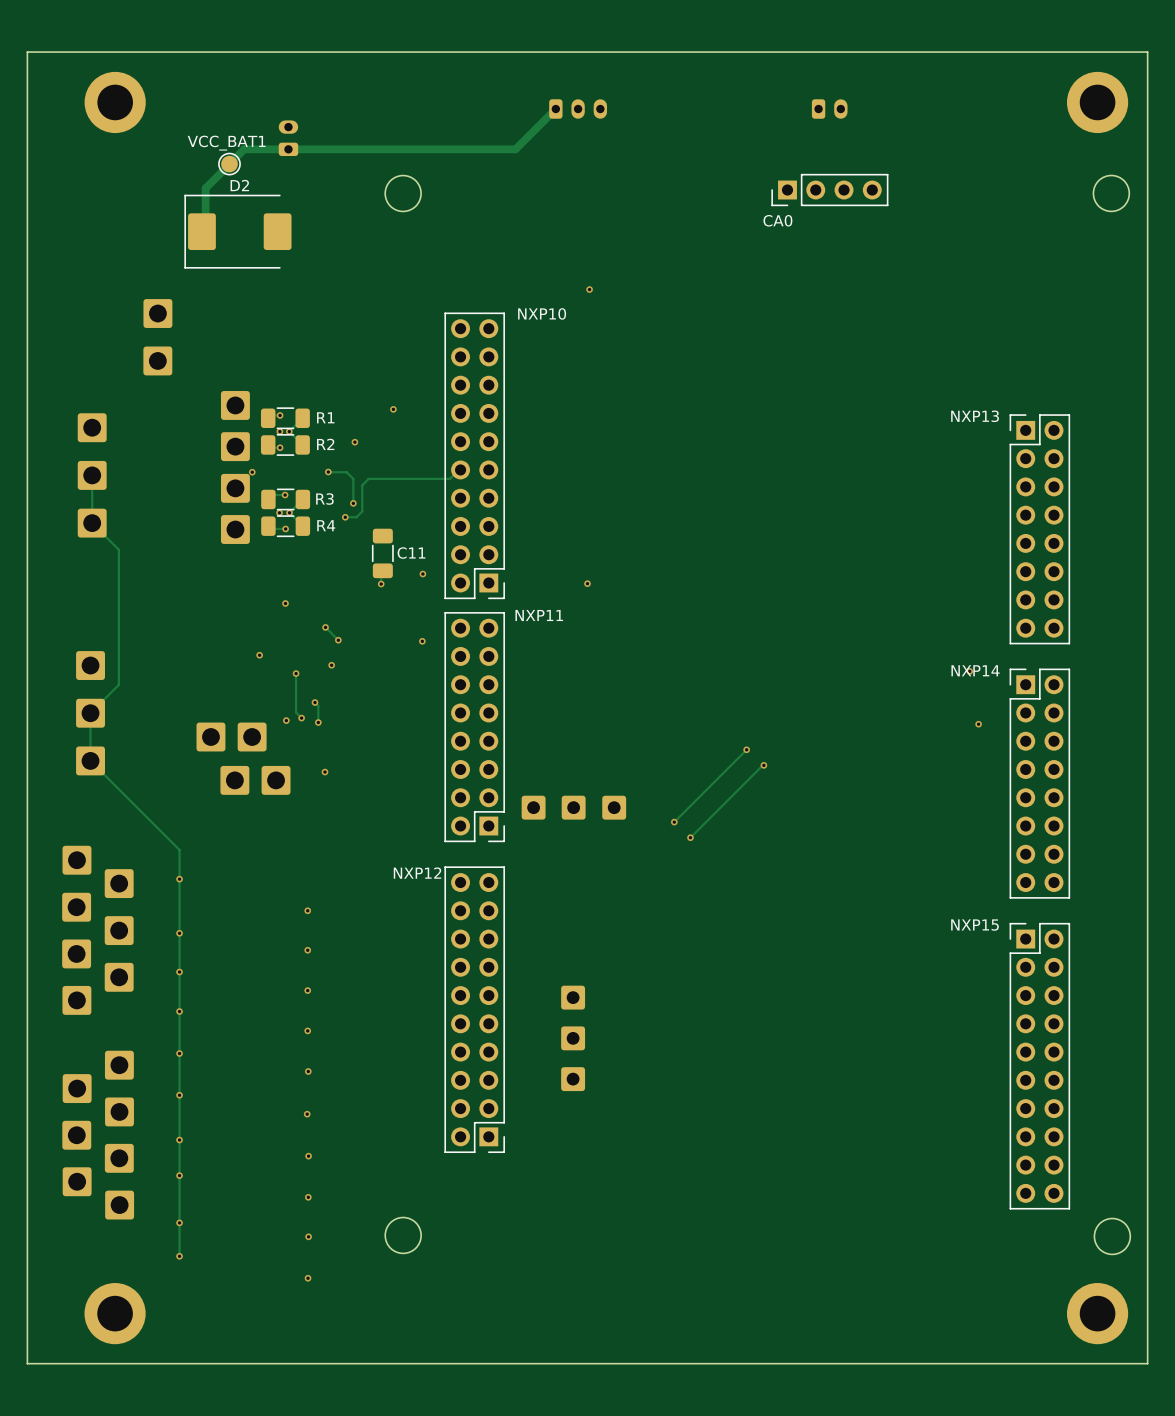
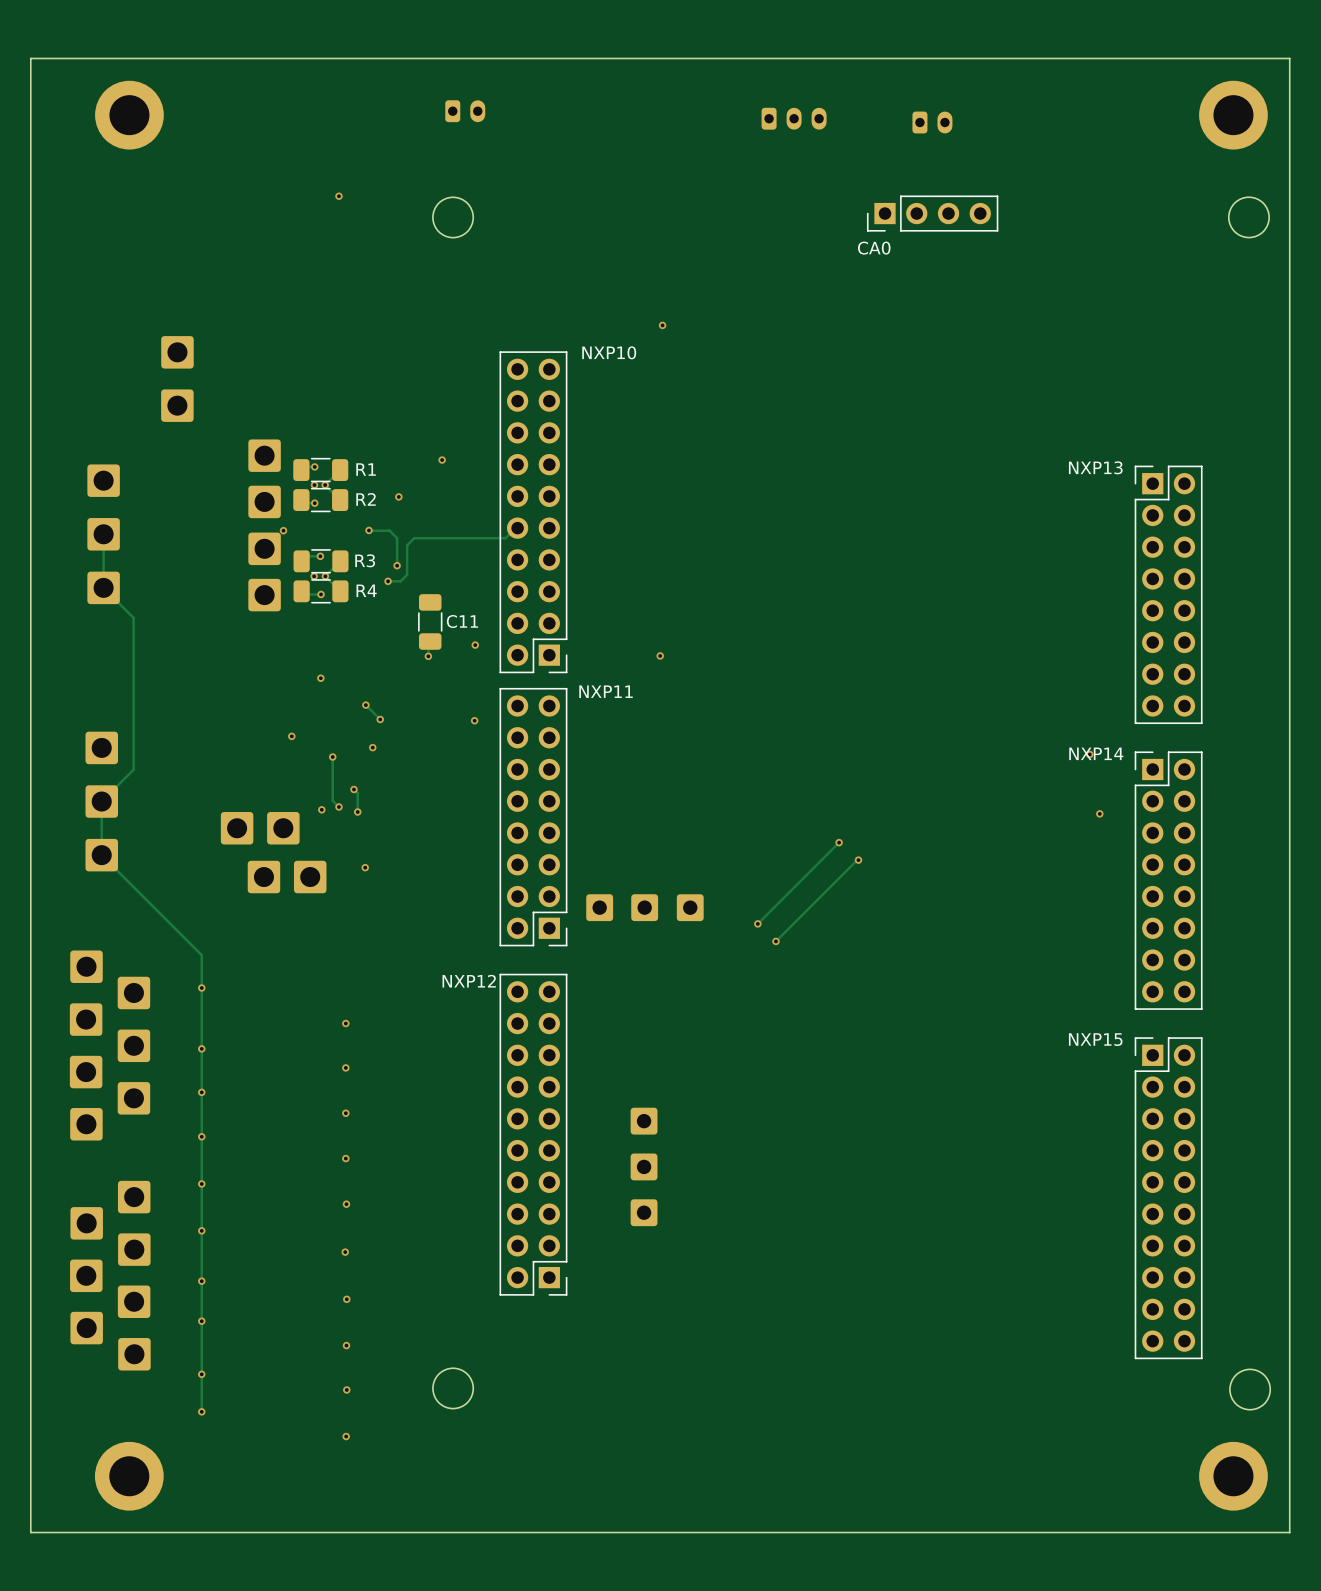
track: (555, 109) (515, 149) (244, 149) (205, 188) (205, 222) (208, 225) -> none
part position: (578, 109) -> (794, 118)
part rotation: 0° (288, 138) -> 90° clockwise (465, 111)
part position: (288, 138) -> (465, 111)
VCC_BAT1: (229, 164) -> none
via: none -> (338, 196)
D2: (238, 231) -> none

